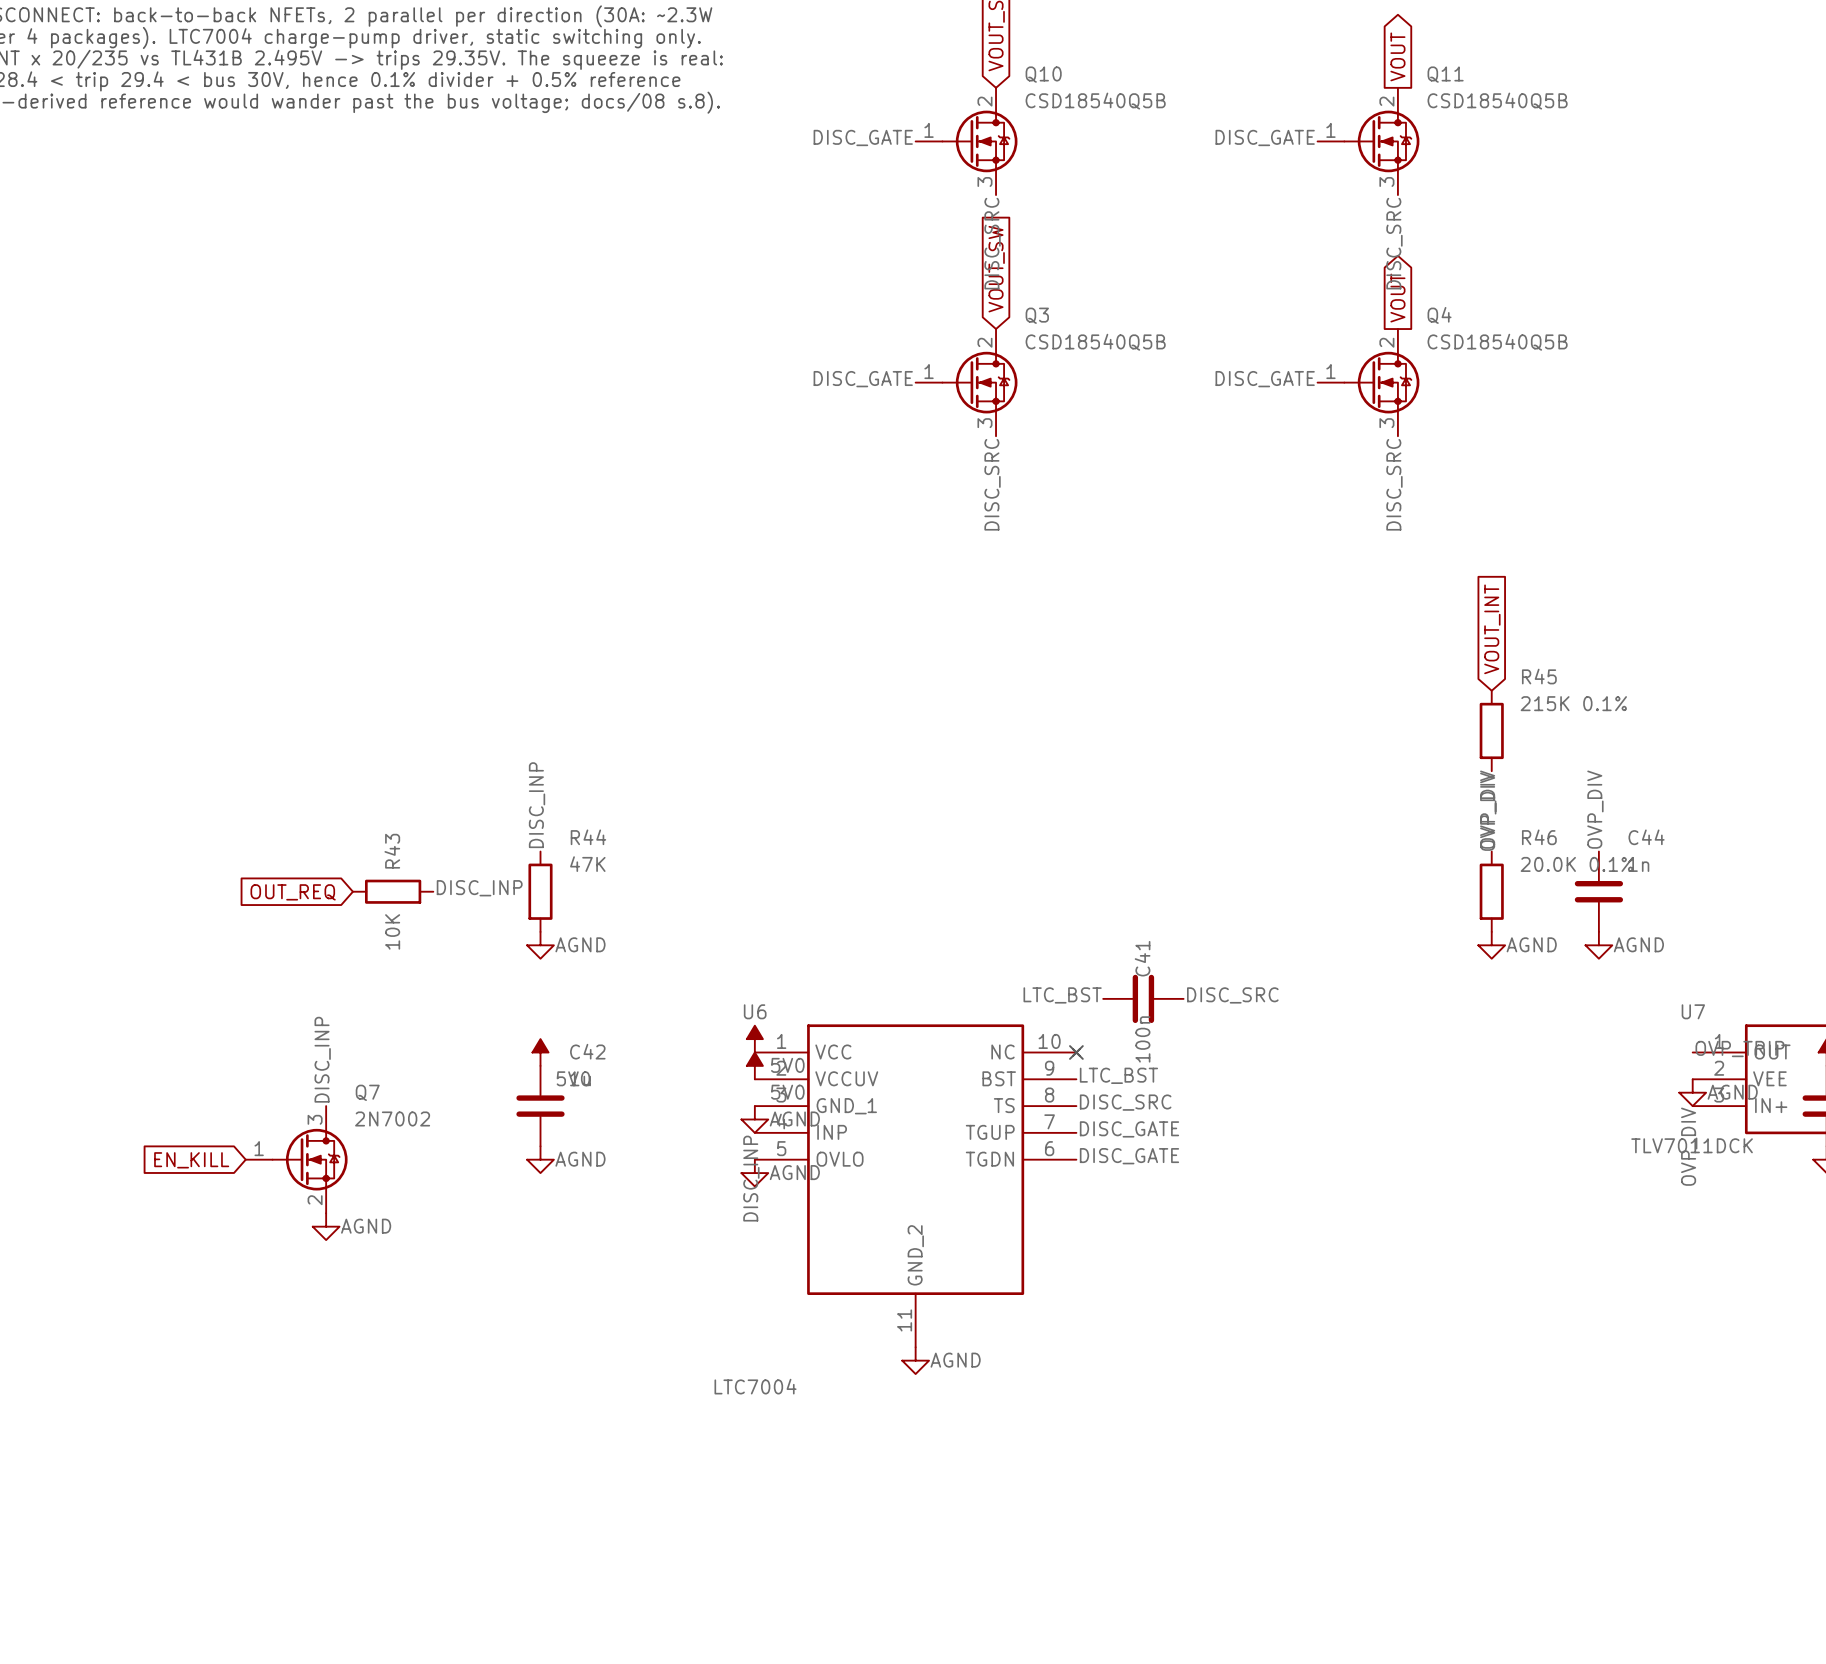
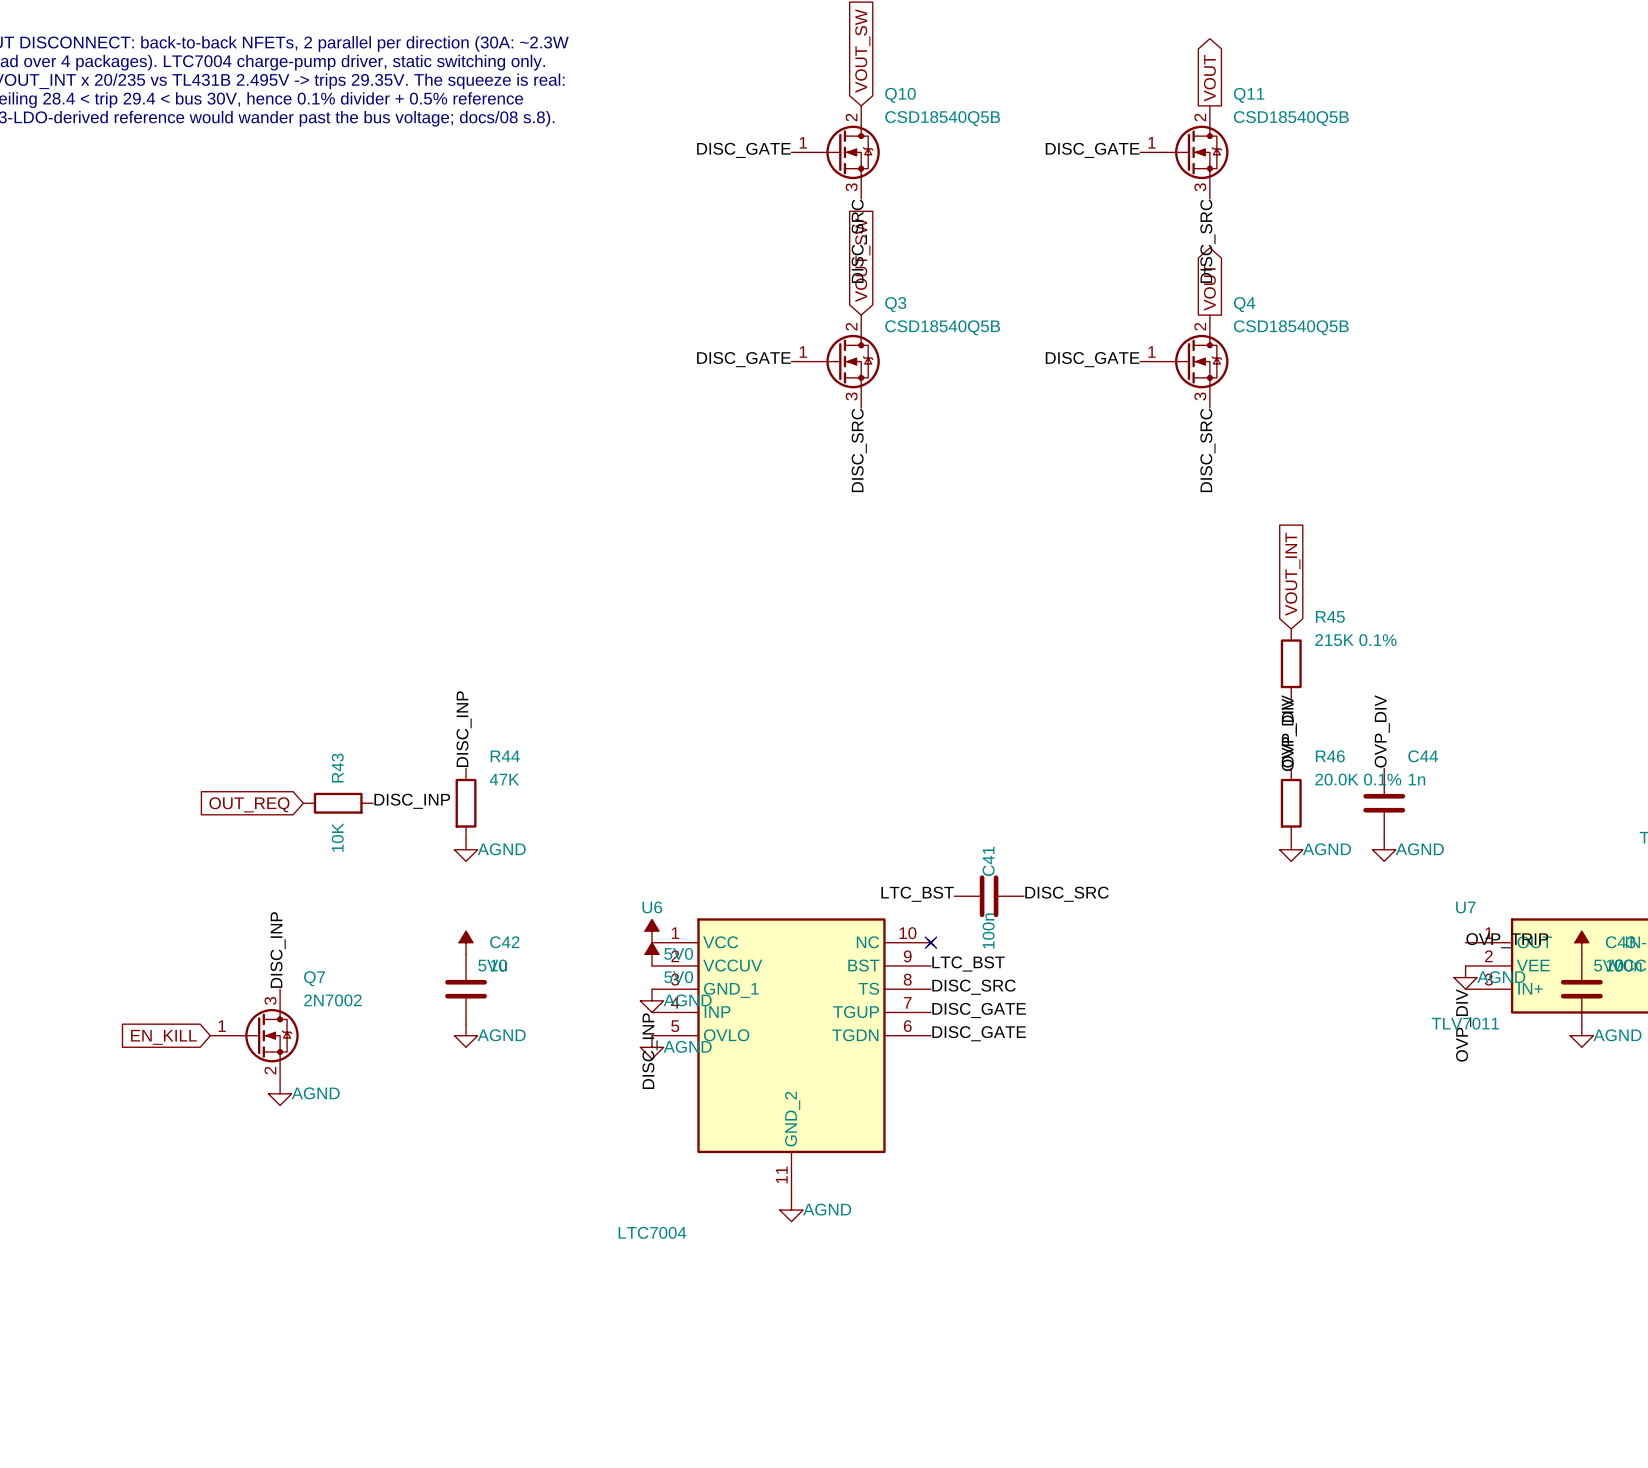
U7 value: TLV7011DCK (1692, 1145) -> TLV7011 (1465, 1023)

